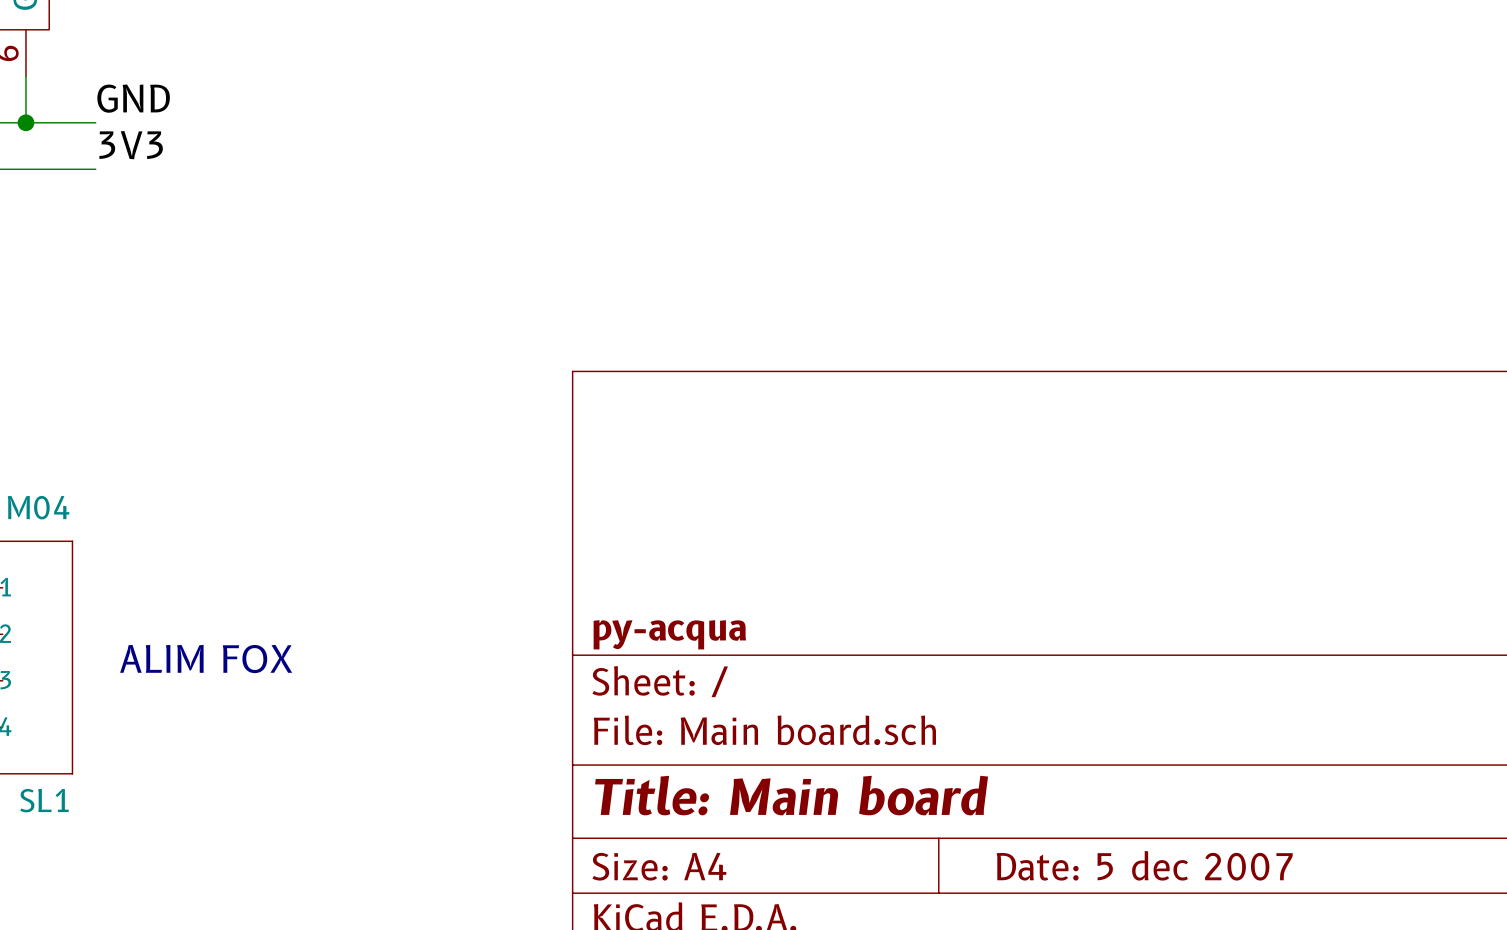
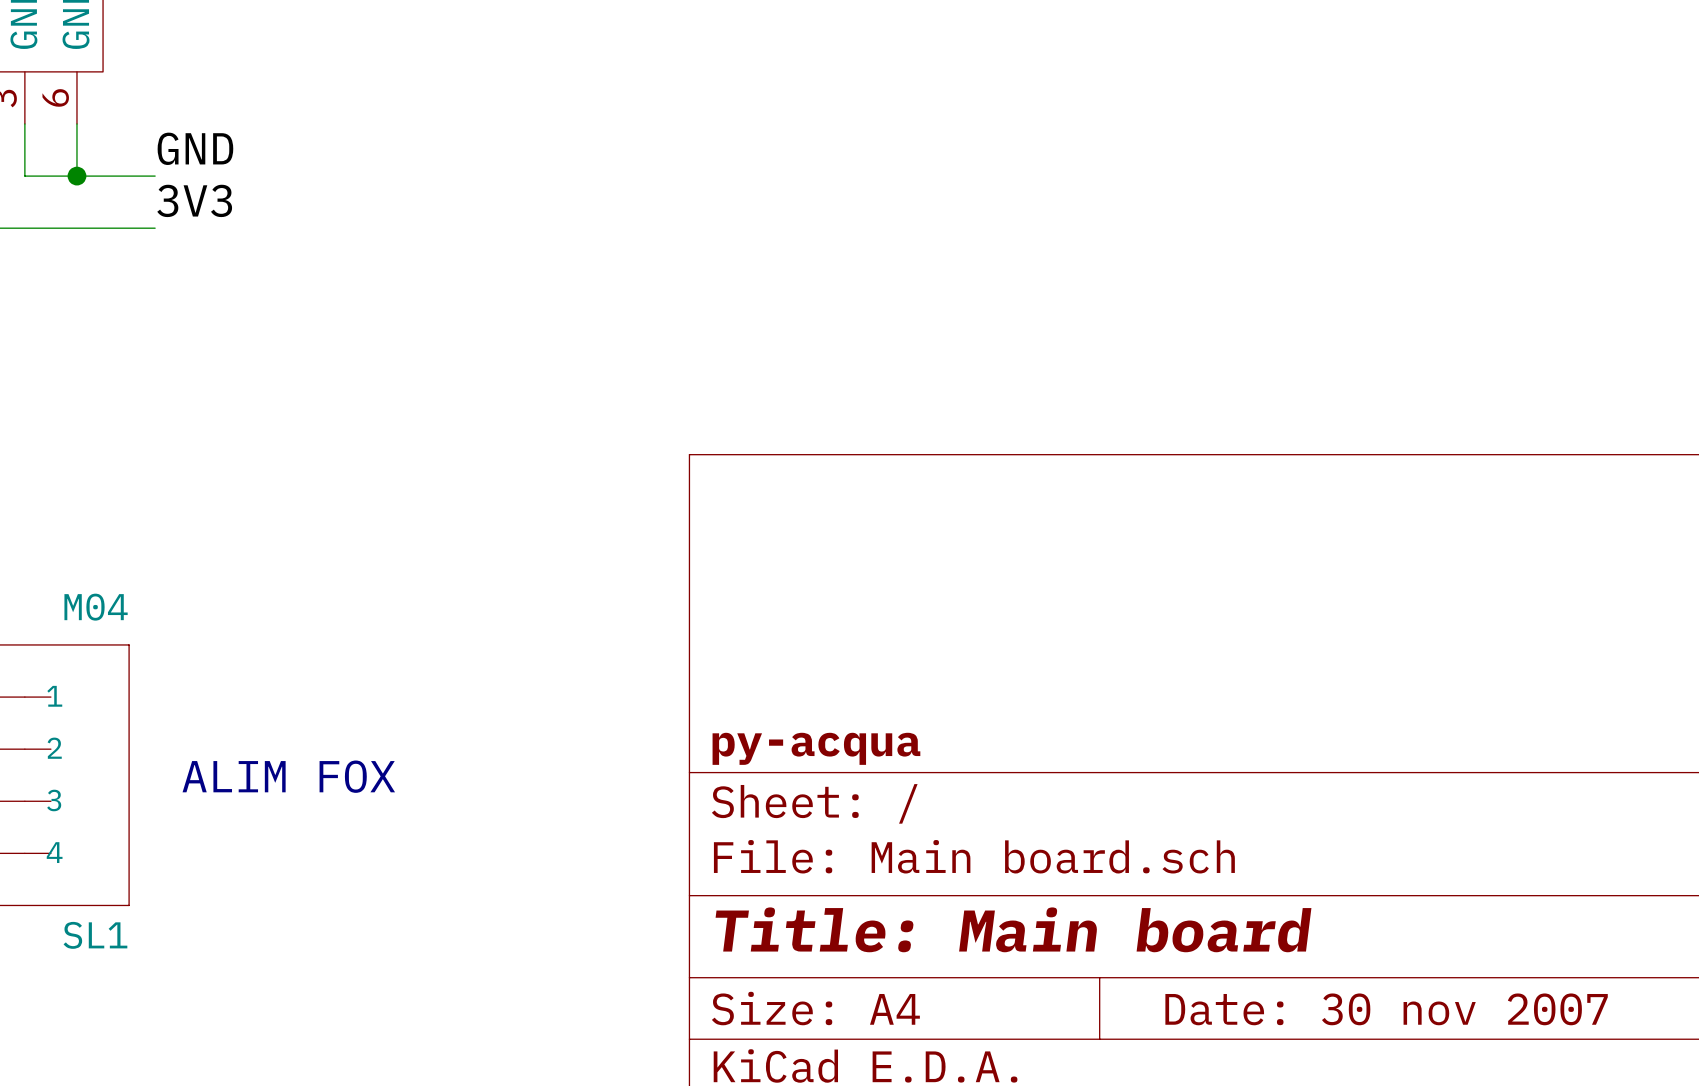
title block: Date: 5 dec 2007 (1144, 865) -> Date: 30 nov 2007 (1386, 1009)

